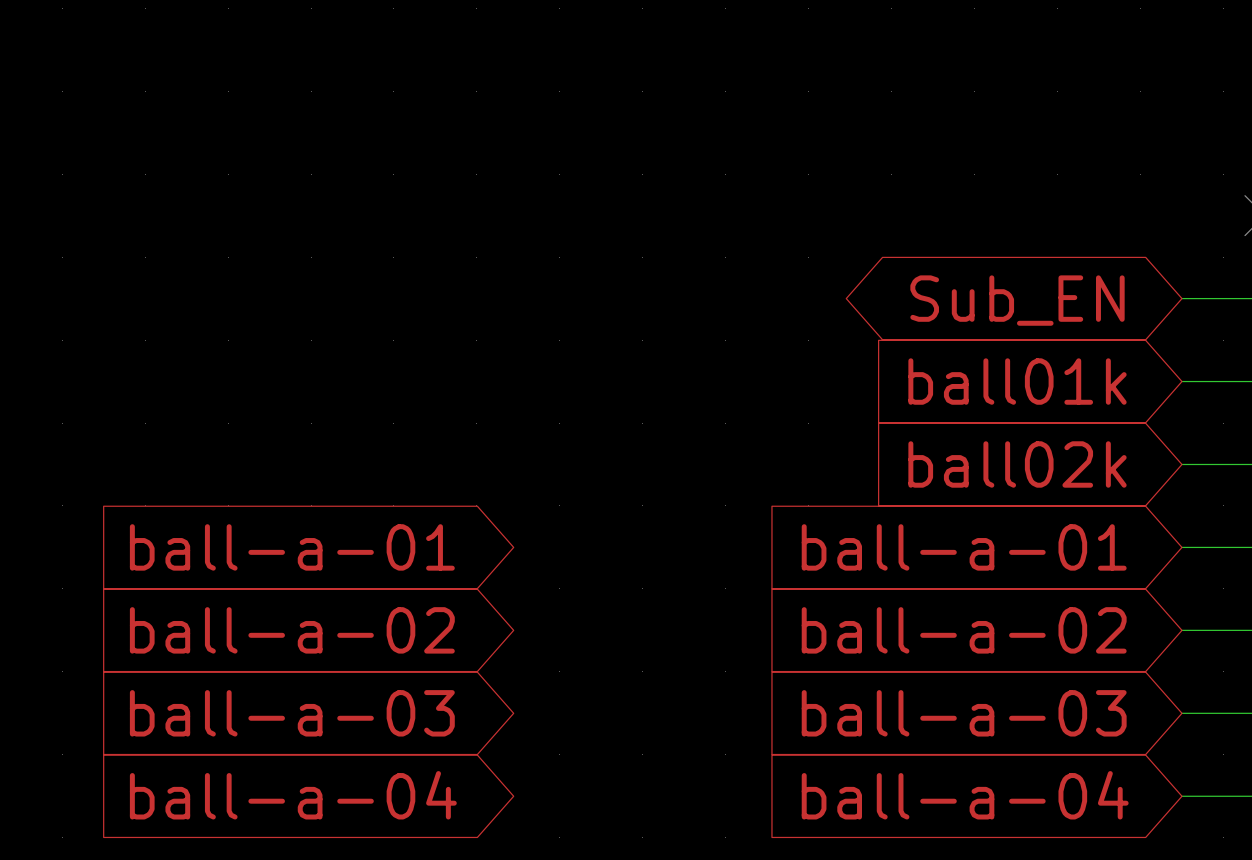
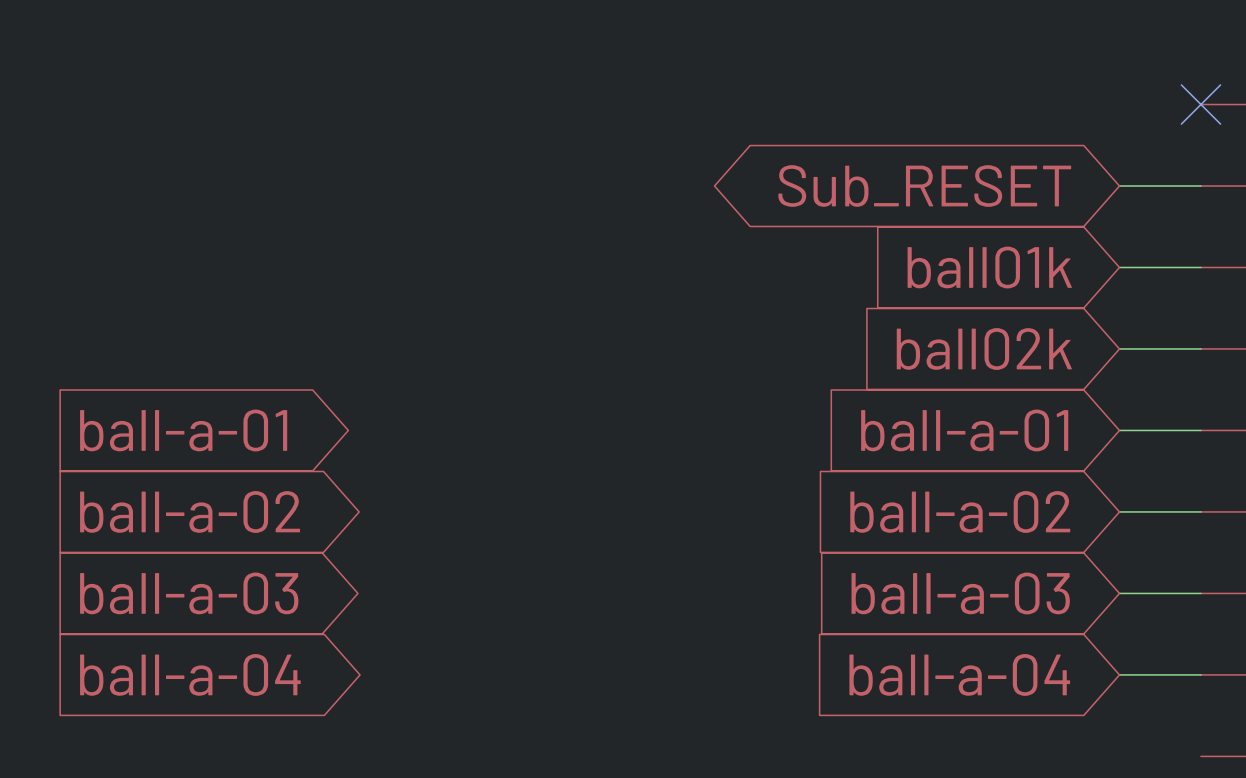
global label: Sub_EN (1017, 300) -> Sub_RESET (924, 186)

